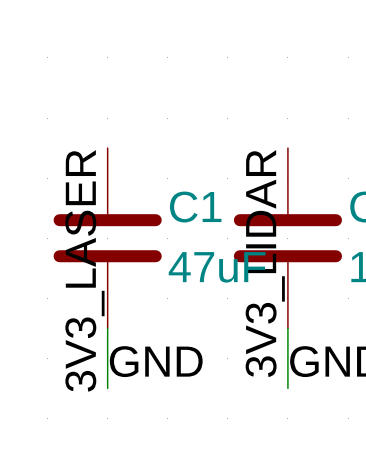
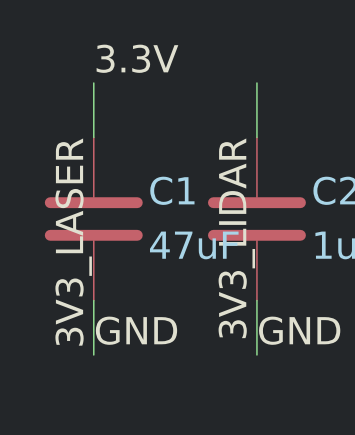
label: none -> 3.3V (137, 58)
wire: none -> (93, 83) (93, 137)
wire: none -> (256, 83) (256, 137)

